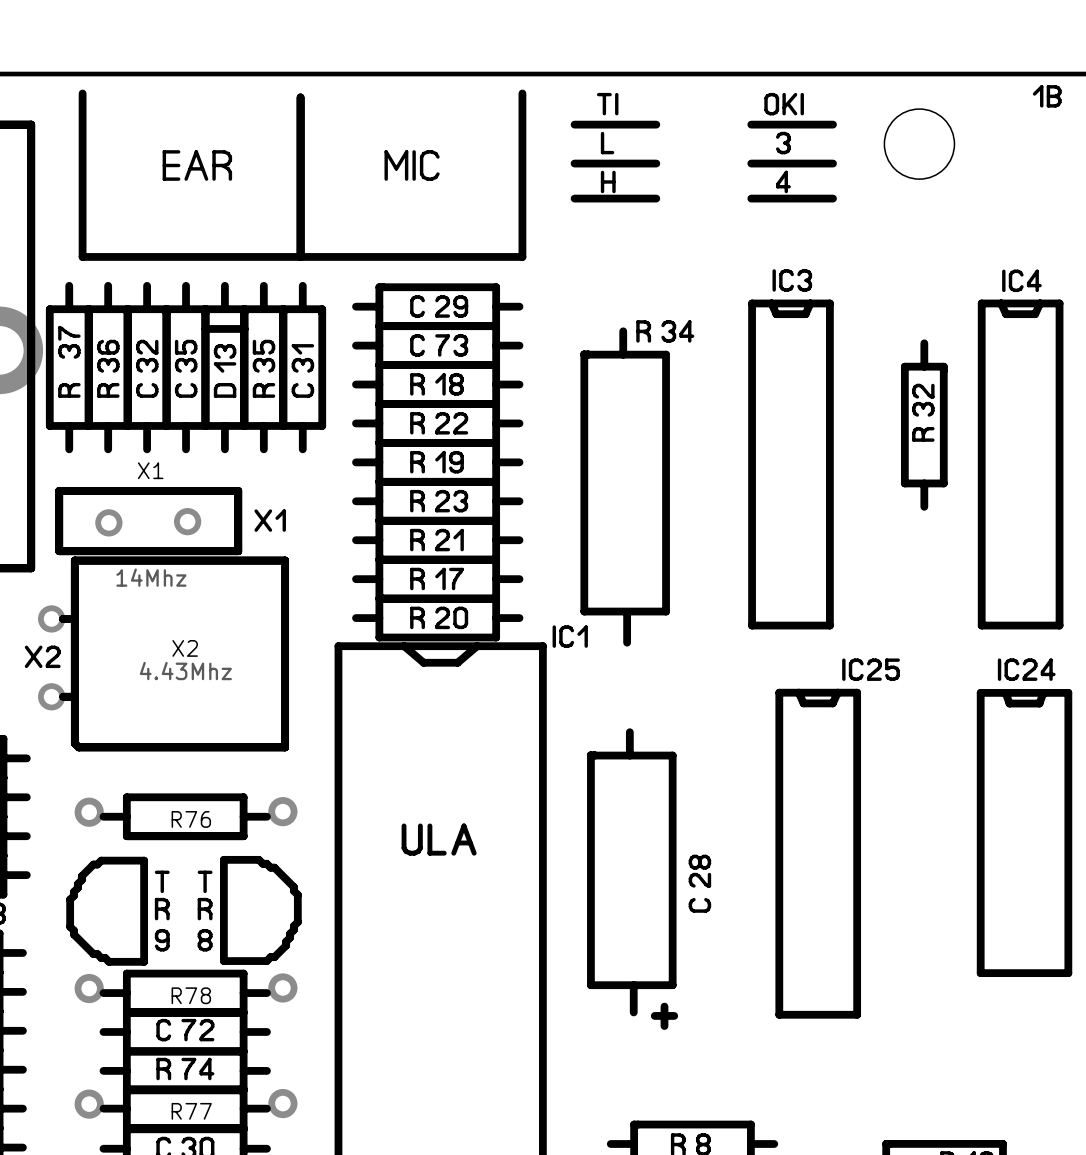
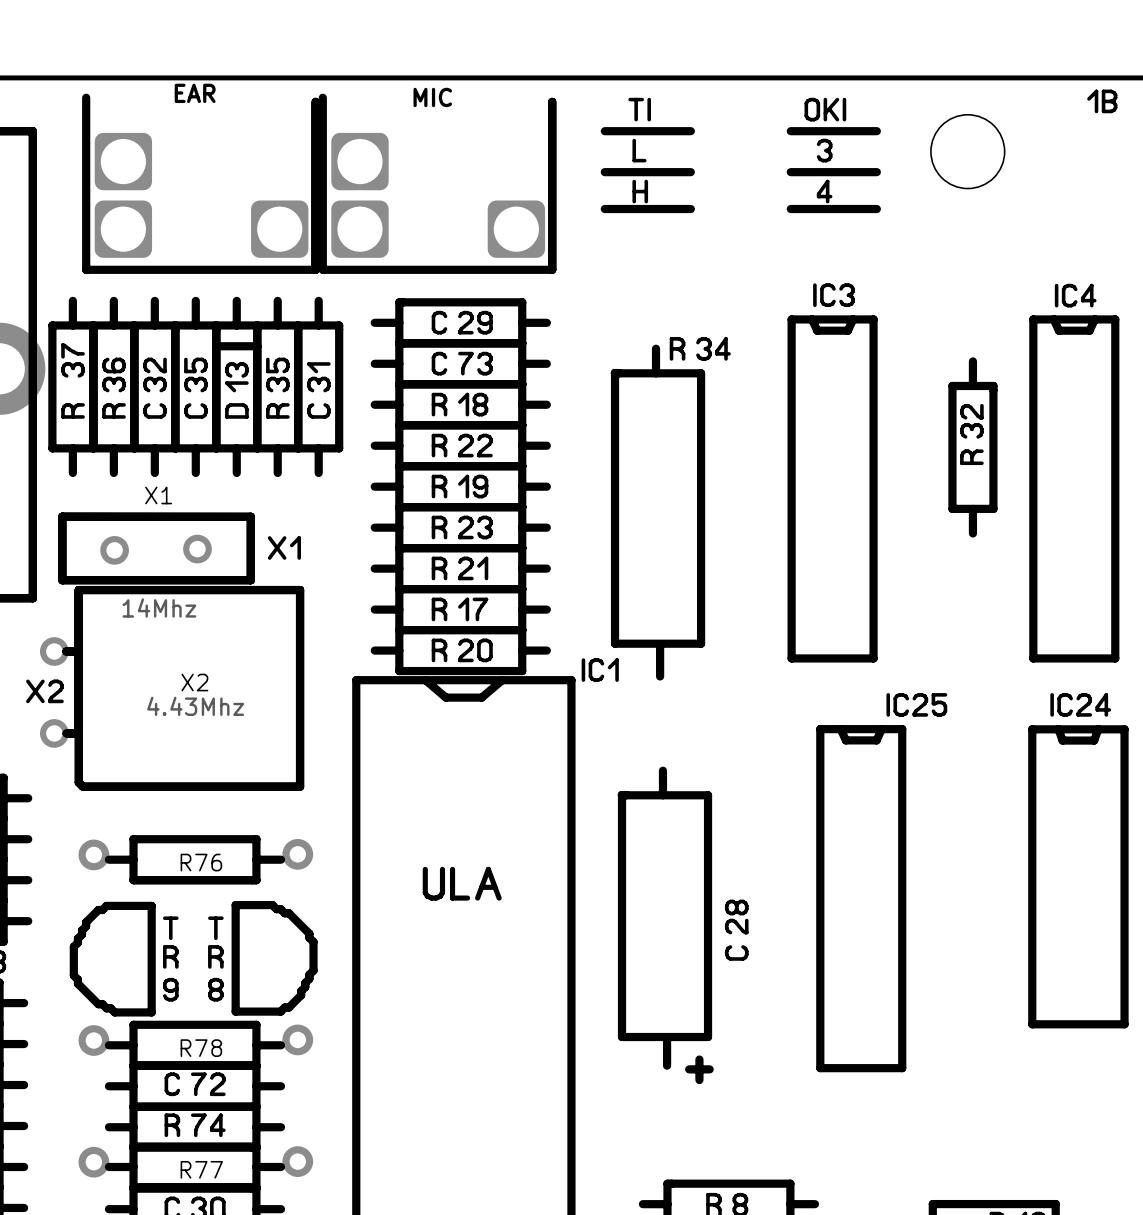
line: (82, 93) (82, 256) (522, 256) (522, 93) -> none
line: (178, 151) (164, 151) (164, 179) (178, 179) -> none
line: (414, 151) (414, 179) -> none
line: (437, 156) (431, 151) (423, 153) (421, 156) (421, 174) (423, 177) (431, 179) (437, 174) -> none
line: (164, 165) (178, 165) -> none
line: (214, 165) (224, 165) (228, 163) (230, 160) (228, 153) (214, 151) (214, 179) -> none
line: (222, 165) (228, 168) (230, 179) -> none
line: (190, 168) (202, 168) -> none
EAR: none -> (200, 183)
MIC: none -> (437, 183)
line: (186, 179) (196, 151) (206, 179) -> none
line: (386, 179) (386, 151) (396, 168) (406, 151) (406, 179) -> none

